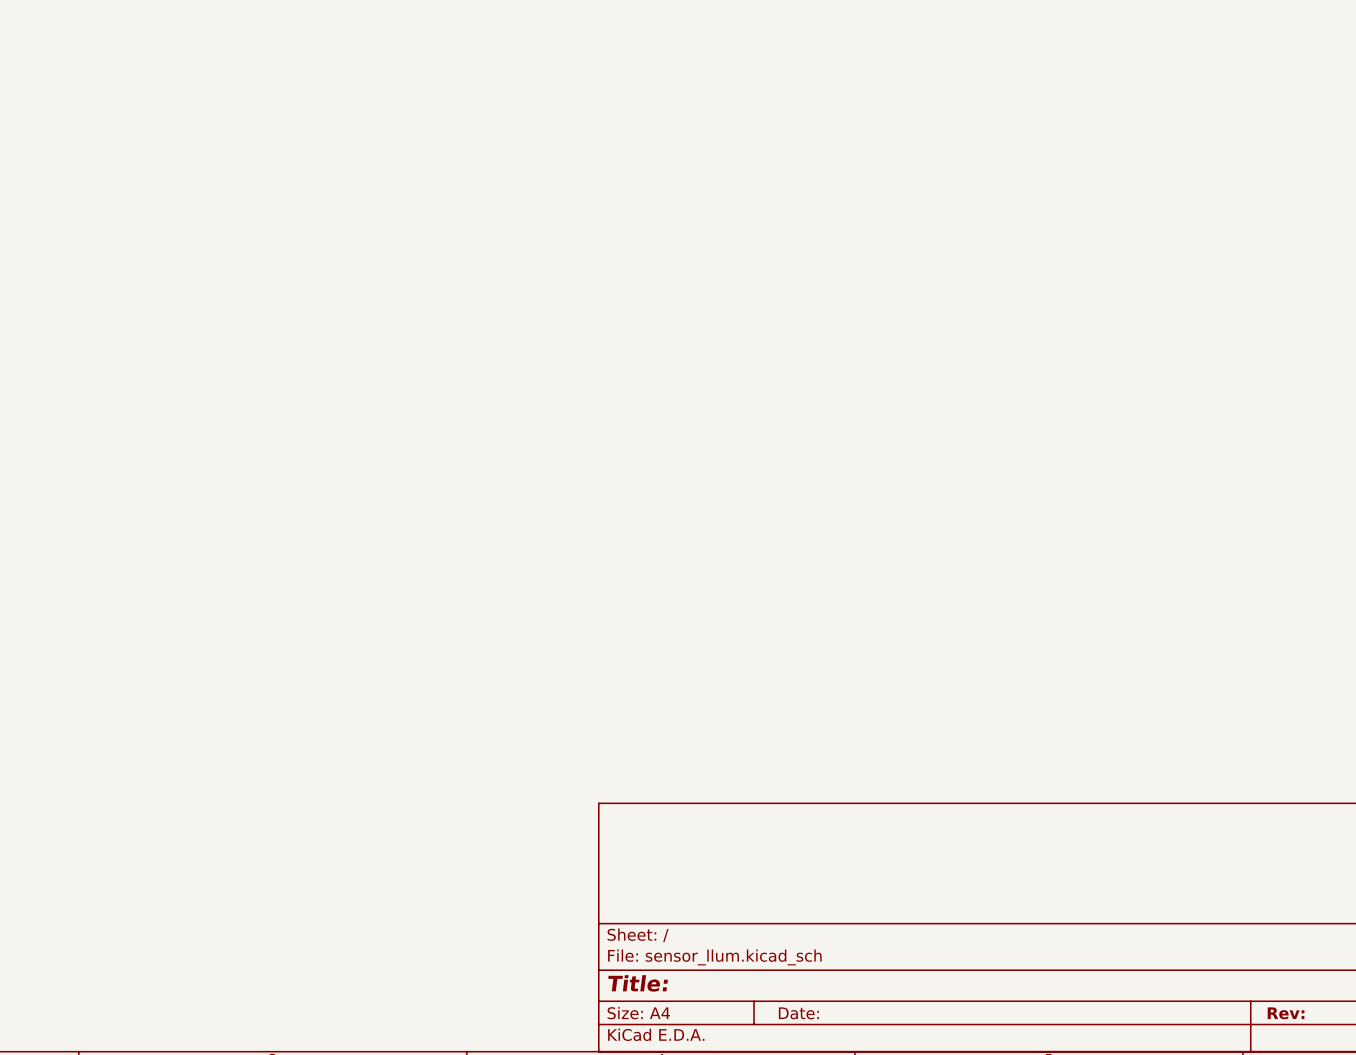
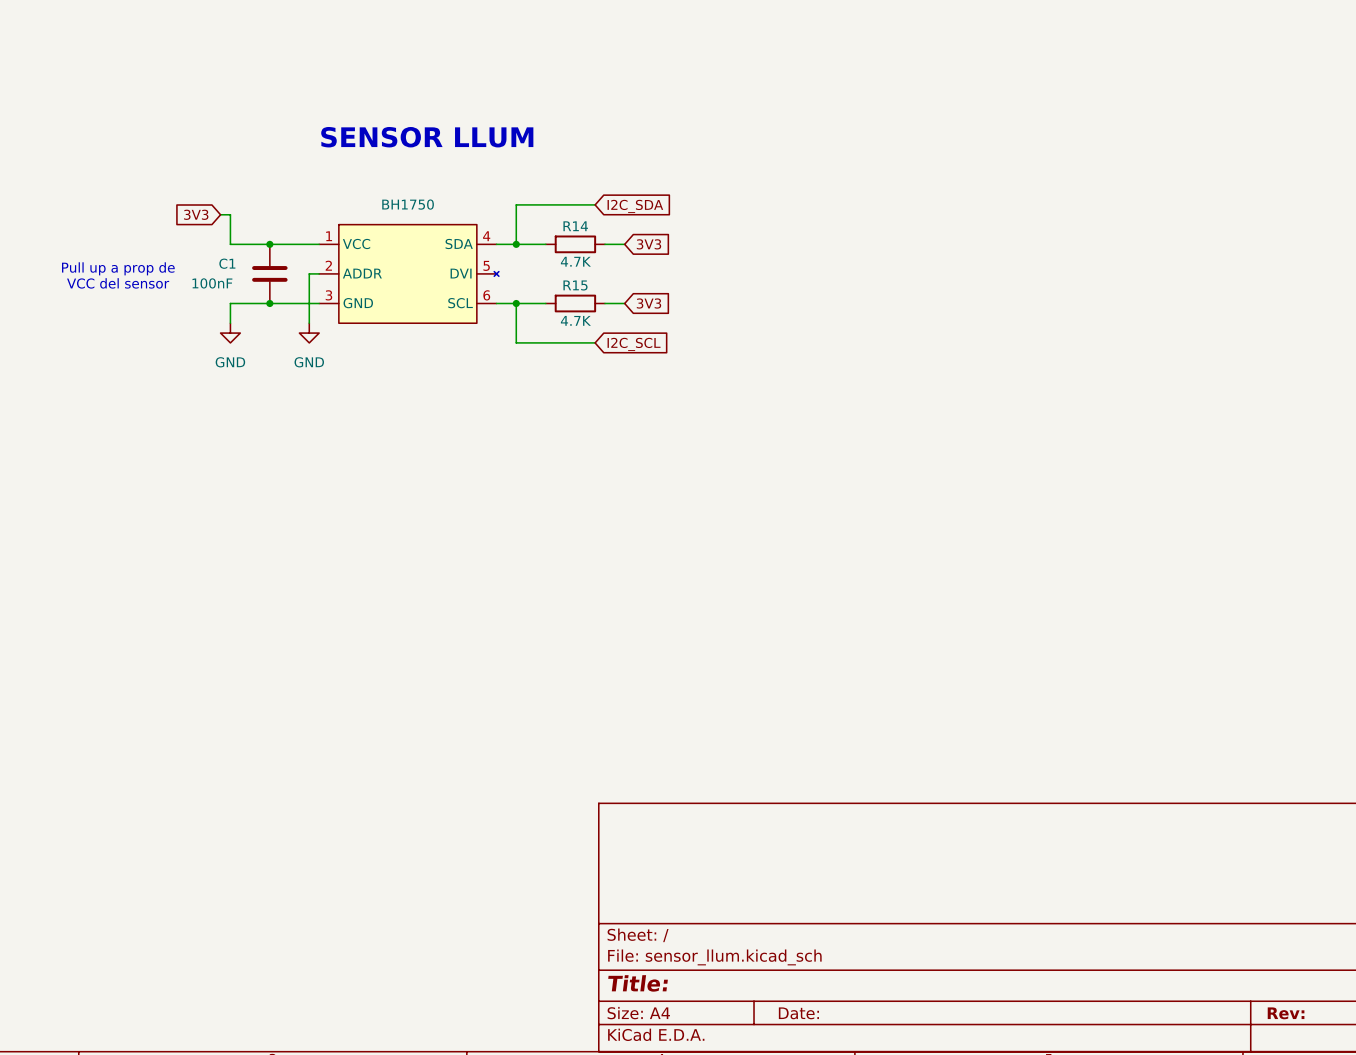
text: none -> SENSOR LLUM (427, 137)
wire: none -> (595, 204) (516, 204) (516, 244)
global label: none -> I2C_SDA (635, 206)
global label: none -> 3V3 (196, 214)
wire: none -> (220, 214) (230, 214) (230, 244) (319, 244)
junction: none -> (269, 244)
wire: none -> (496, 244) (545, 244)
junction: none -> (516, 244)
R14: none -> 4.7K (575, 244)
wire: none -> (604, 244) (624, 244)
global label: none -> 3V3 (648, 244)
text: none -> Pull up a prop de (118, 268)
C1: none -> 100nF (269, 273)
wire: none -> (319, 273) (309, 273) (309, 323)
BH1750: none -> (409, 273)
text: none -> VCC del sensor (118, 283)
junction: none -> (269, 303)
wire: none -> (319, 303) (230, 303) (230, 323)
wire: none -> (496, 303) (545, 303)
wire: none -> (516, 303) (516, 342) (595, 342)
junction: none -> (516, 303)
R15: none -> 4.7K (575, 303)
wire: none -> (604, 303) (624, 303)
global label: none -> 3V3 (648, 303)
power symbol: none -> GND (230, 333)
power symbol: none -> GND (309, 333)
global label: none -> I2C_SCL (634, 344)

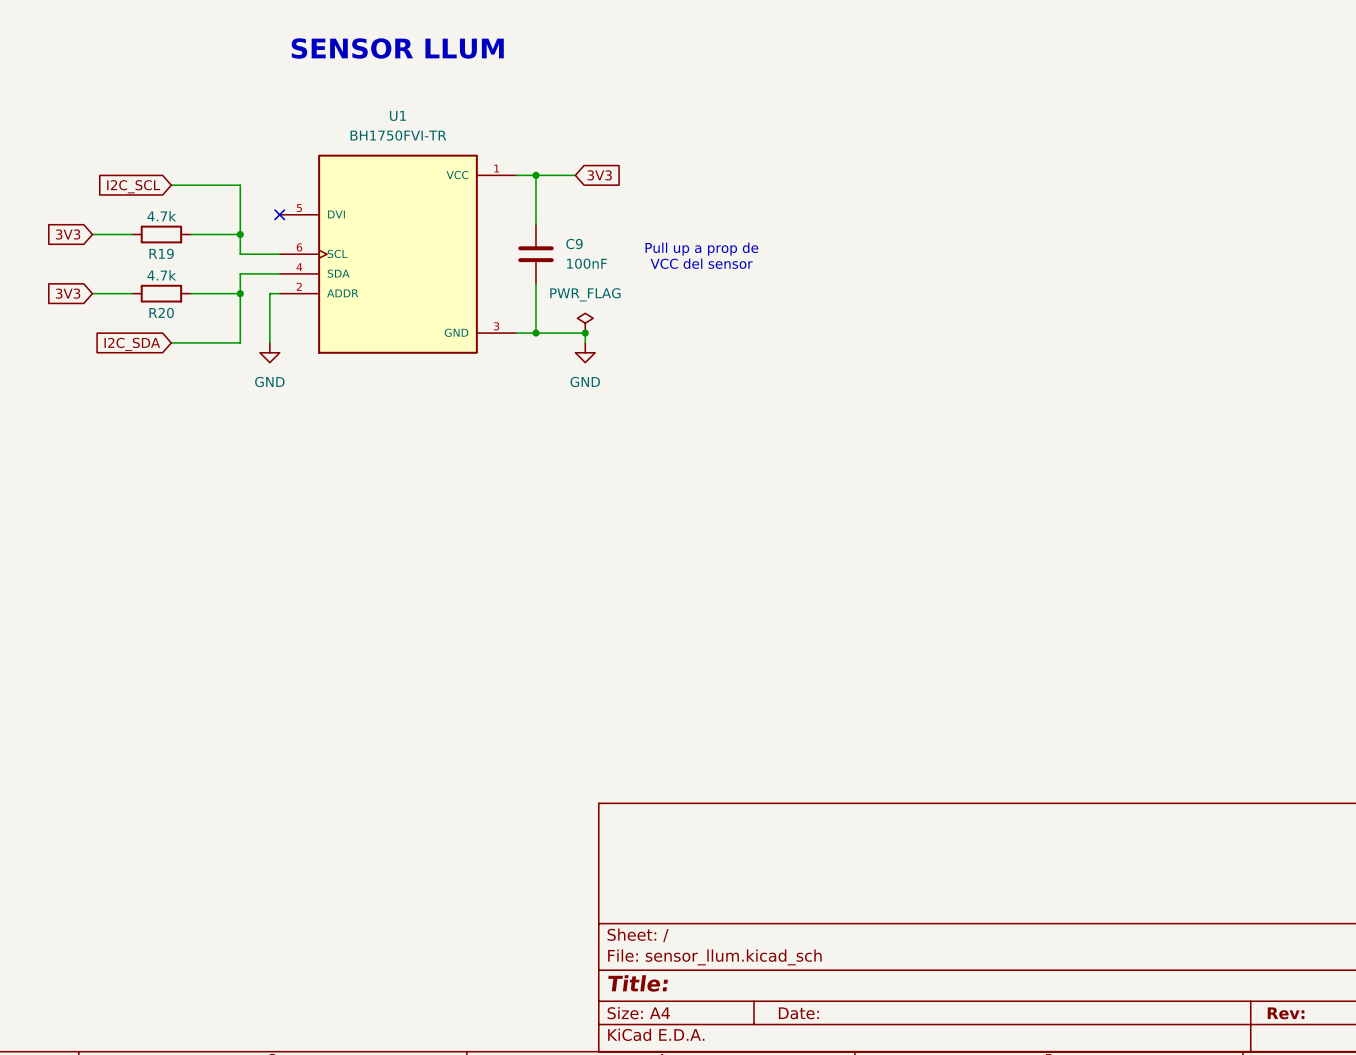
text position: SENSOR LLUM (427, 137) -> SENSOR LLUM (397, 48)
wire: none -> (516, 175) (575, 175)
wire: none -> (535, 175) (535, 224)
junction: none -> (535, 175)
global label: none -> 3V3 (599, 175)
wire: none -> (171, 185) (240, 185) (240, 254) (279, 254)
global label: none -> I2C_SCL (133, 186)
wire: (595, 204) (516, 204) (516, 244) -> none
global label: I2C_SDA (635, 206) -> none
global label: 3V3 (196, 214) -> none
wire: (220, 214) (230, 214) (230, 244) (319, 244) -> none
no-connect mark: none -> (279, 214)
global label: none -> 3V3 (68, 234)
wire: none -> (92, 234) (131, 234)
R19: none -> 4.7k (161, 234)
wire: none -> (191, 234) (240, 234)
junction: none -> (240, 234)
junction: (269, 244) -> none
wire: (496, 244) (545, 244) -> none
junction: (516, 244) -> none
R14: 4.7K (575, 244) -> none
wire: (604, 244) (624, 244) -> none
global label: 3V3 (648, 244) -> none
text: none -> Pull up a prop de (701, 249)
U1: none -> BH1750FVI-TR (397, 254)
C9: none -> 100nF (535, 254)
text: none -> VCC del sensor (701, 263)
text: Pull up a prop de (118, 268) -> none
C1: 100nF (269, 273) -> none
wire: none -> (279, 273) (240, 273) (240, 342) (171, 342)
wire: (319, 273) (309, 273) (309, 323) -> (279, 293) (269, 293) (269, 342)
BH1750: (409, 273) -> none
text: VCC del sensor (118, 283) -> none
wire: none -> (535, 283) (535, 333)
global label: none -> 3V3 (68, 293)
wire: none -> (92, 293) (131, 293)
R20: none -> 4.7k (161, 293)
wire: none -> (191, 293) (240, 293)
junction: none -> (240, 293)
junction: (269, 303) -> none
wire: (319, 303) (230, 303) (230, 323) -> none
wire: (496, 303) (545, 303) -> none
wire: (516, 303) (516, 342) (595, 342) -> none
junction position: (516, 303) -> (535, 333)
R15: 4.7K (575, 303) -> none
wire: (604, 303) (624, 303) -> none
global label: 3V3 (648, 303) -> none
power symbol: none -> PWR_FLAG (585, 323)
power symbol: GND (230, 333) -> none
power symbol: GND (309, 333) -> none
wire: none -> (516, 333) (585, 333) (585, 342)
junction: none -> (585, 333)
global label: none -> I2C_SDA (132, 344)
global label: I2C_SCL (634, 344) -> none
power symbol: none -> GND (269, 352)
power symbol: none -> GND (585, 352)

